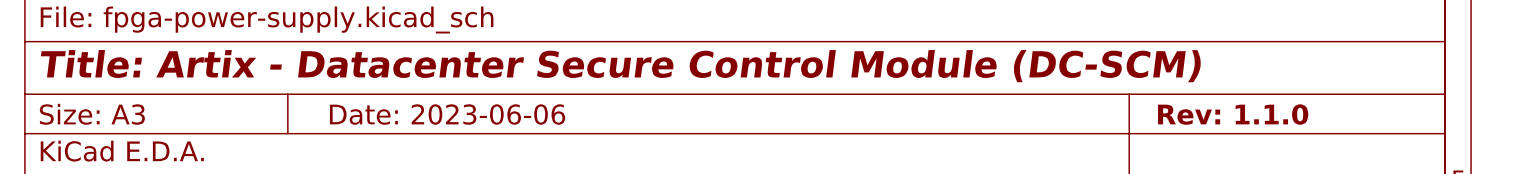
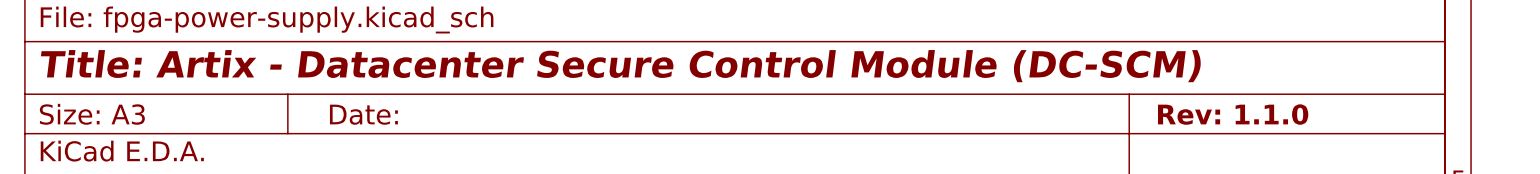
title block: Date: 2023-06-06 (447, 114) -> Date: (363, 114)

